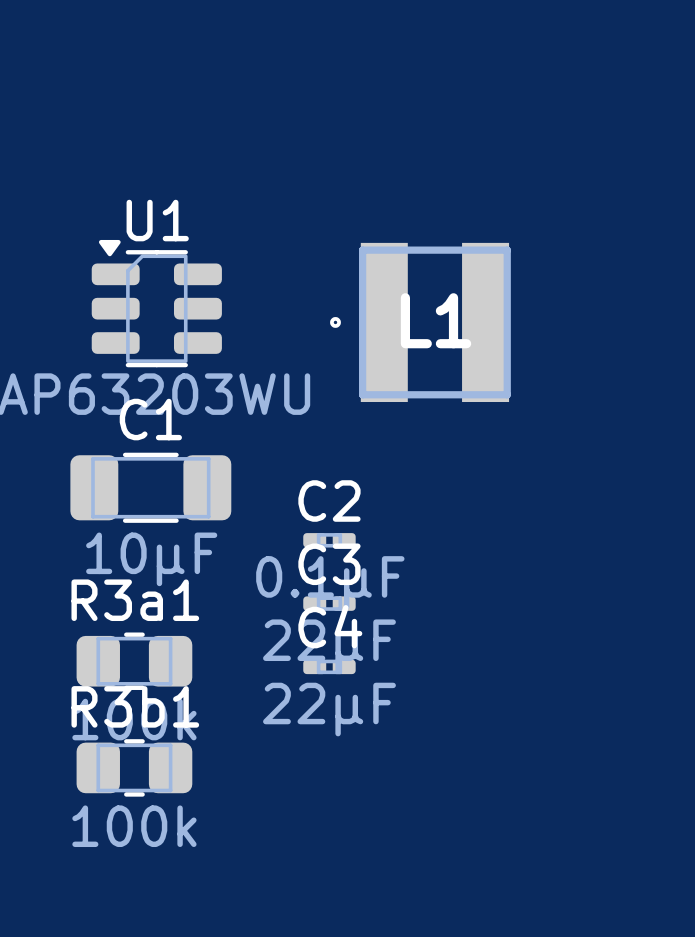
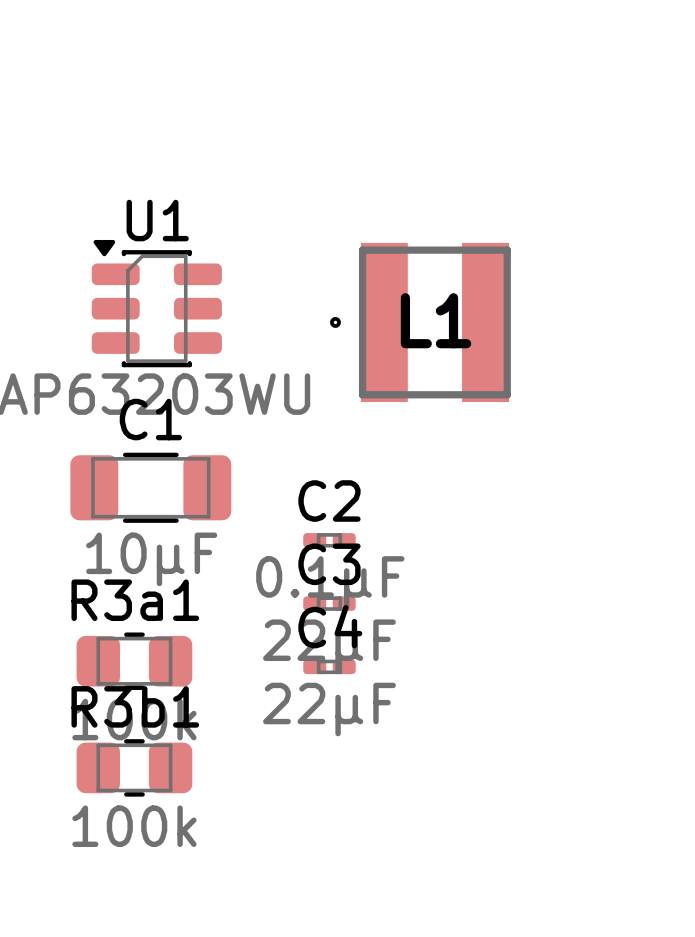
U1 footprint: [91, 239, 222, 368] -> [91, 239, 222, 368]

